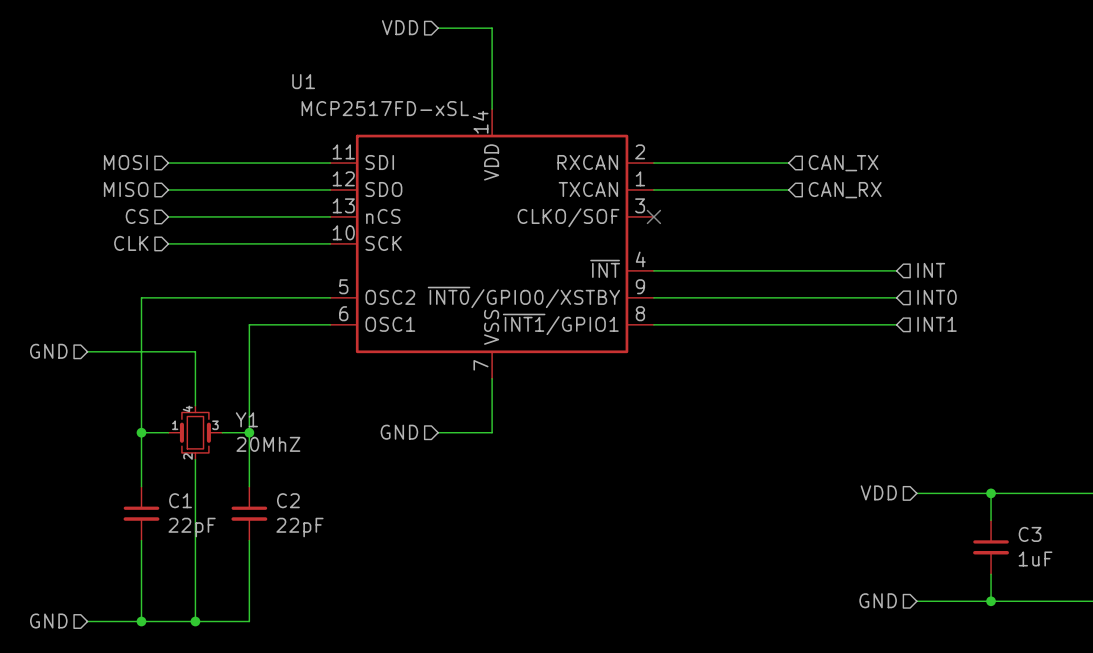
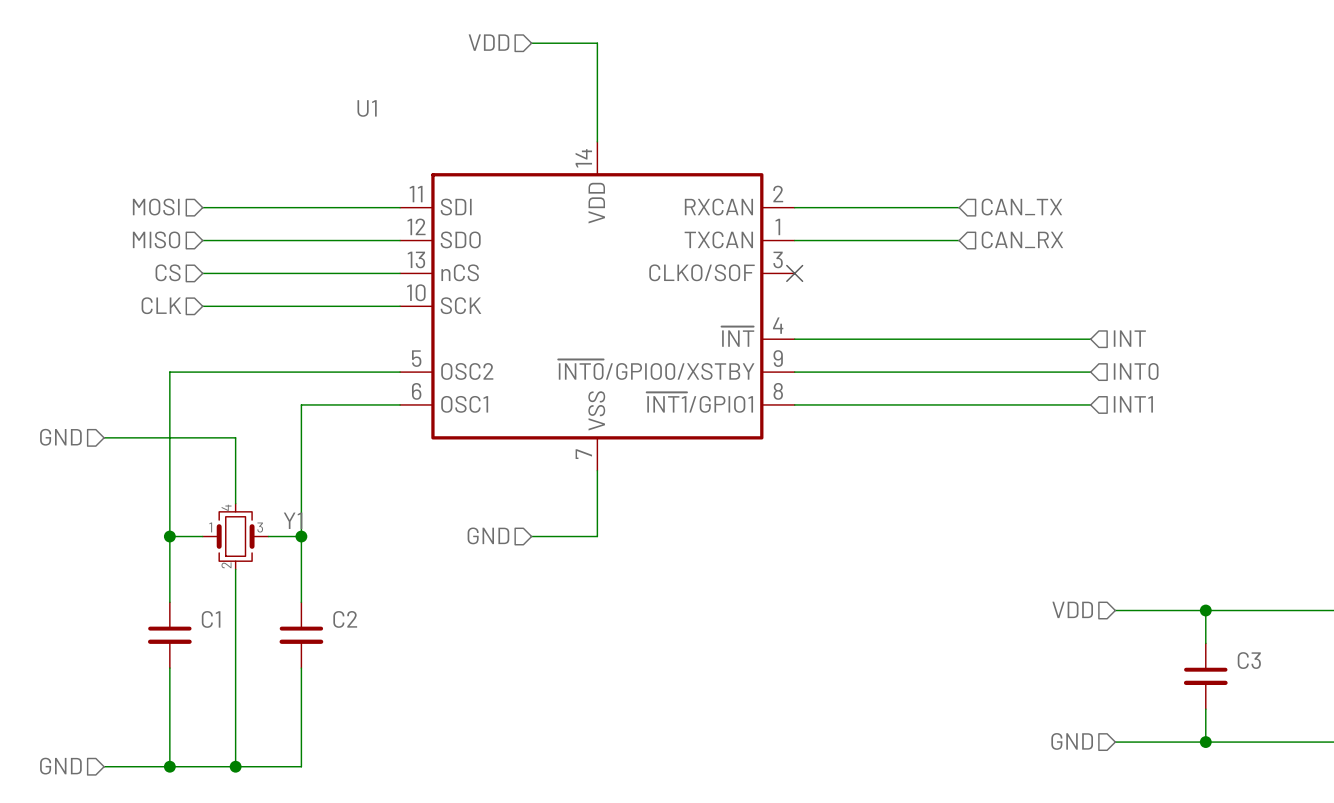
U1 value: MCP2517FD-xSL (385, 108) -> none
Y1 value: 20MhZ (268, 444) -> none
C1 value: 22pF (192, 527) -> none
C2 value: 22pF (299, 527) -> none
C3 value: 1uF (1035, 558) -> none

